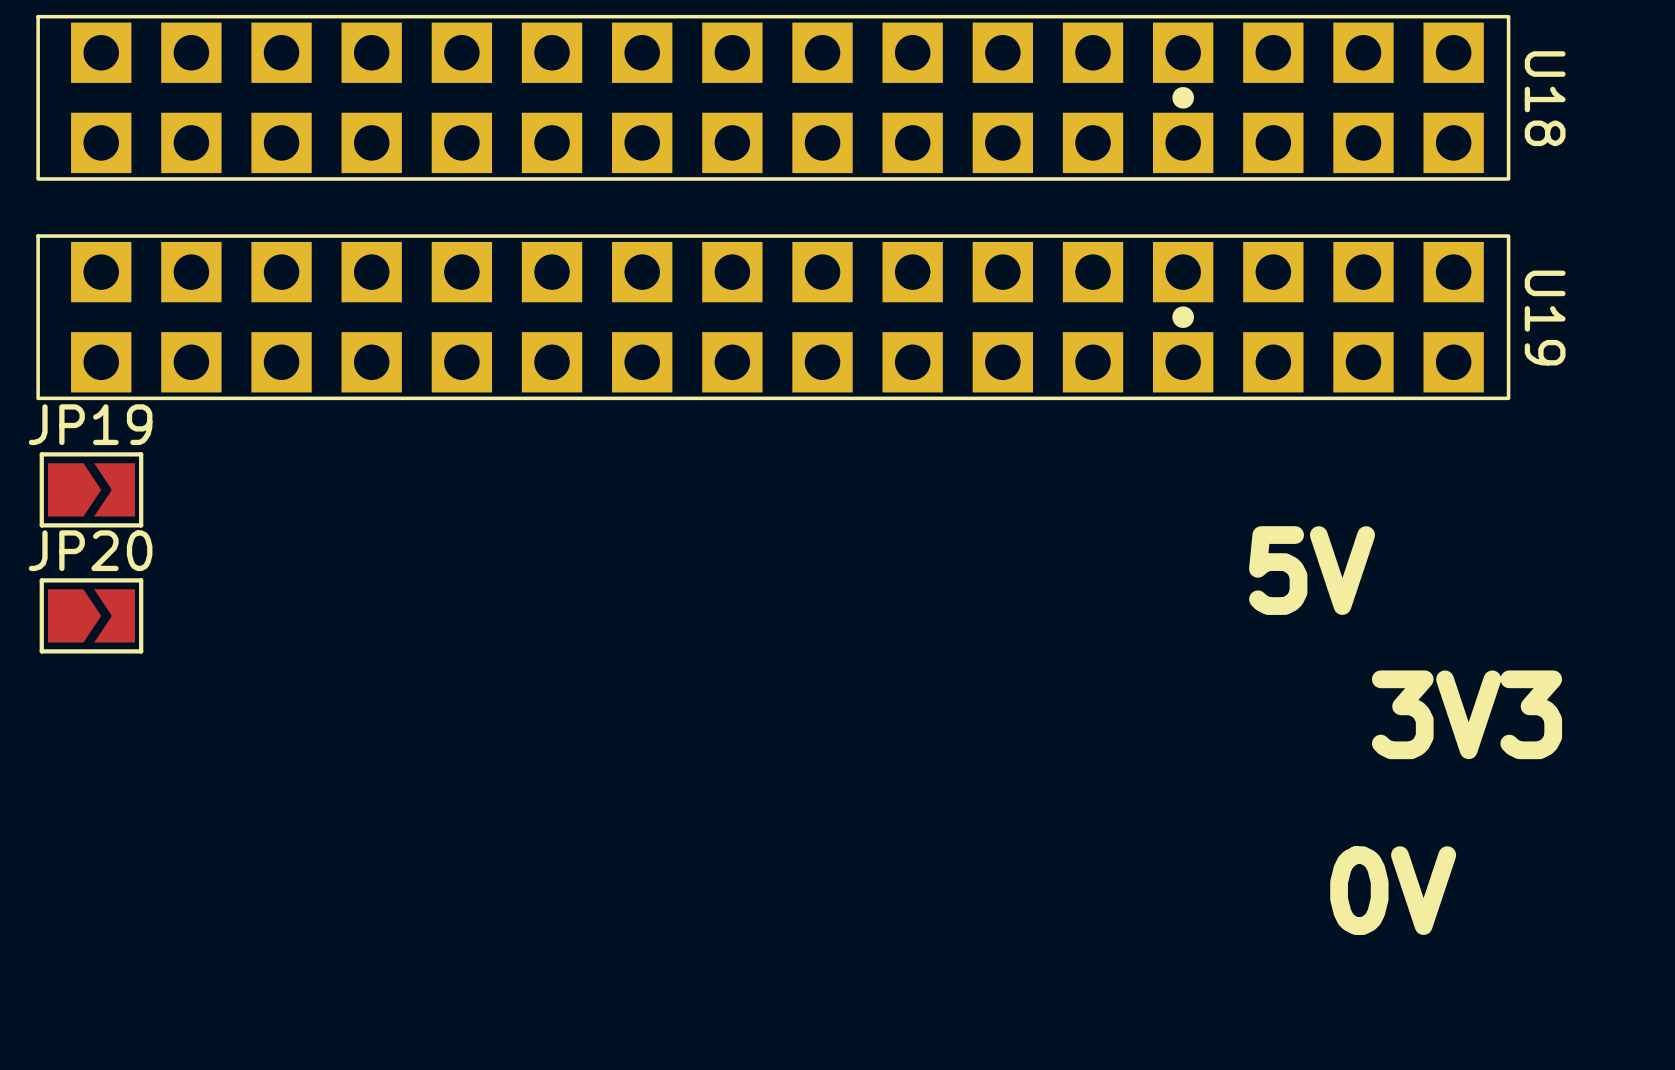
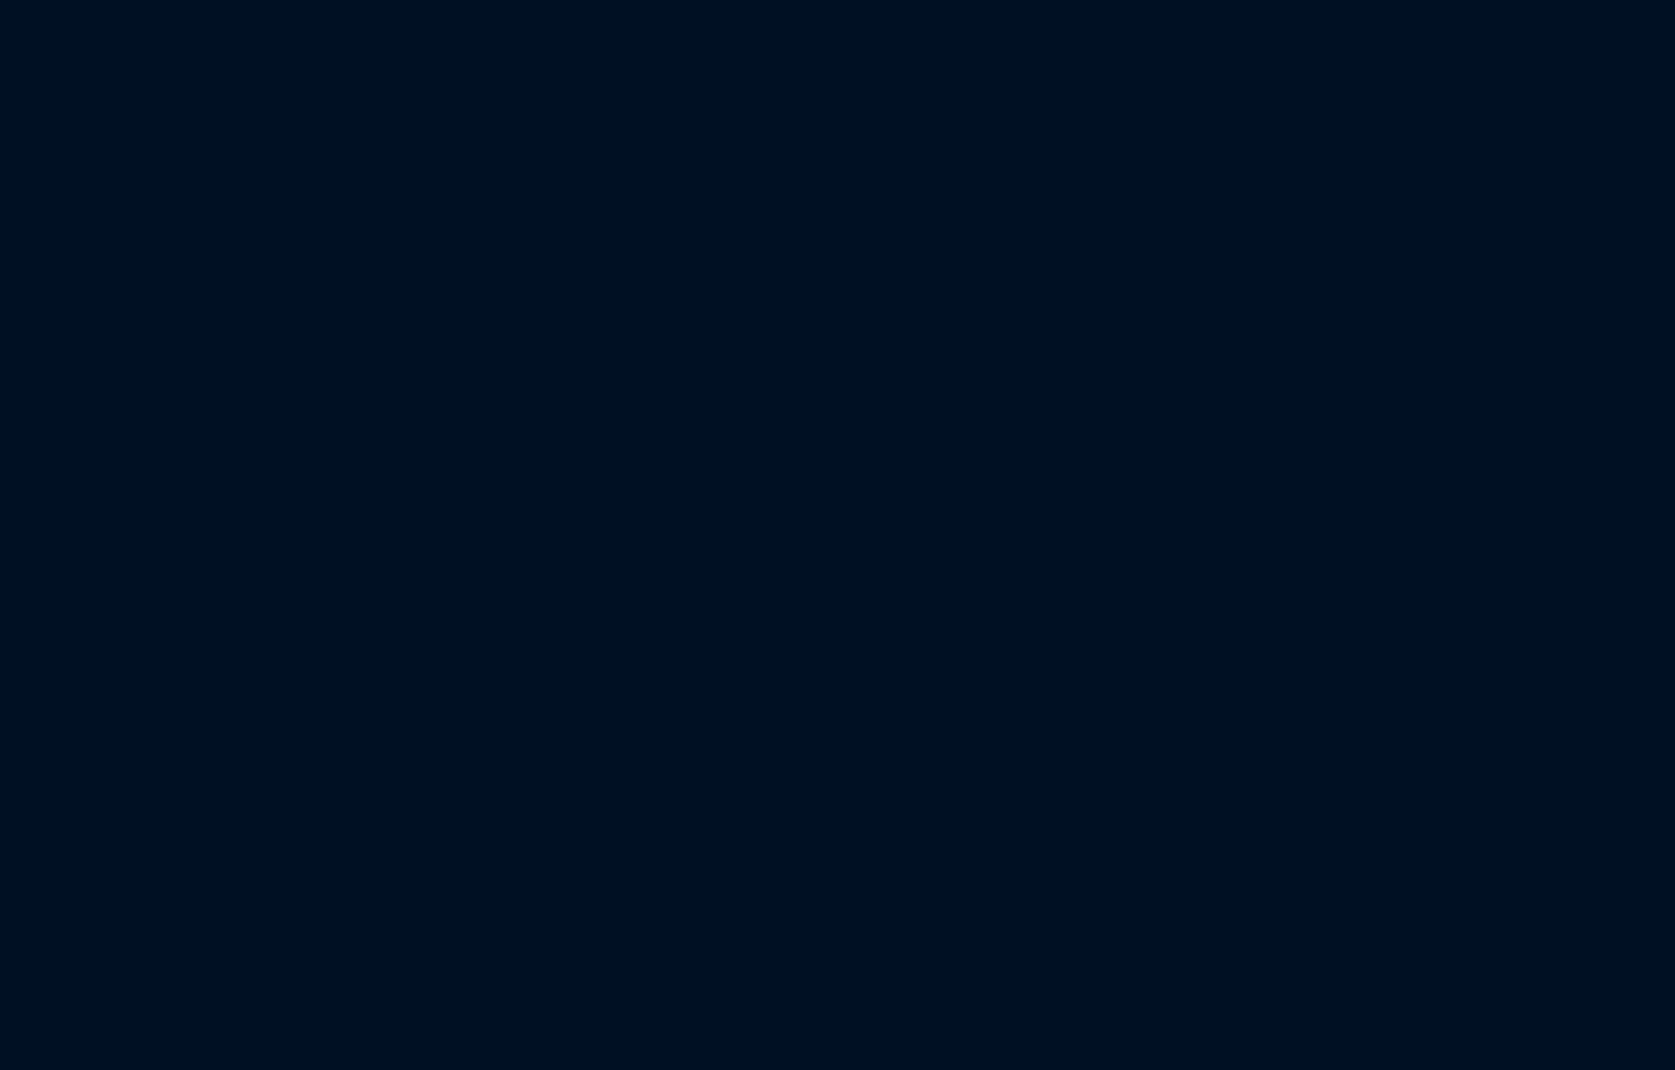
U18: (773, 97) -> none
U19: (773, 317) -> none
JP19: (91, 489) -> none
text: 5V (1312, 570) -> none
JP20: (91, 615) -> none
text: 3V3 (1467, 714) -> none
text: 0V (1393, 890) -> none

